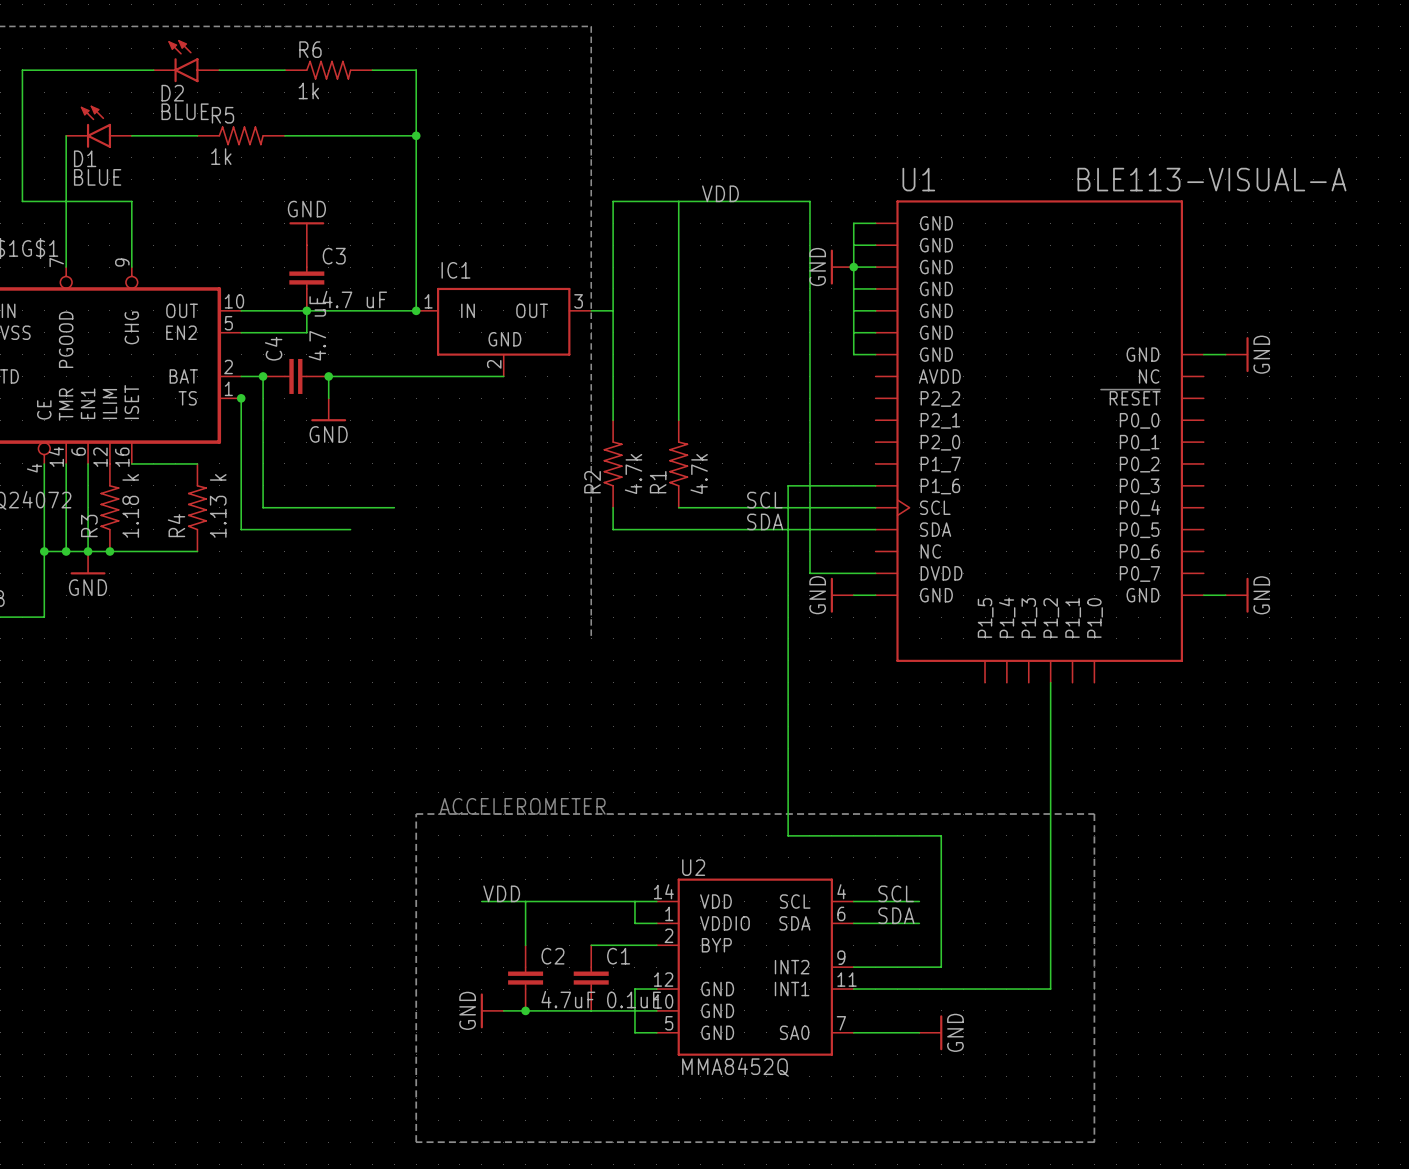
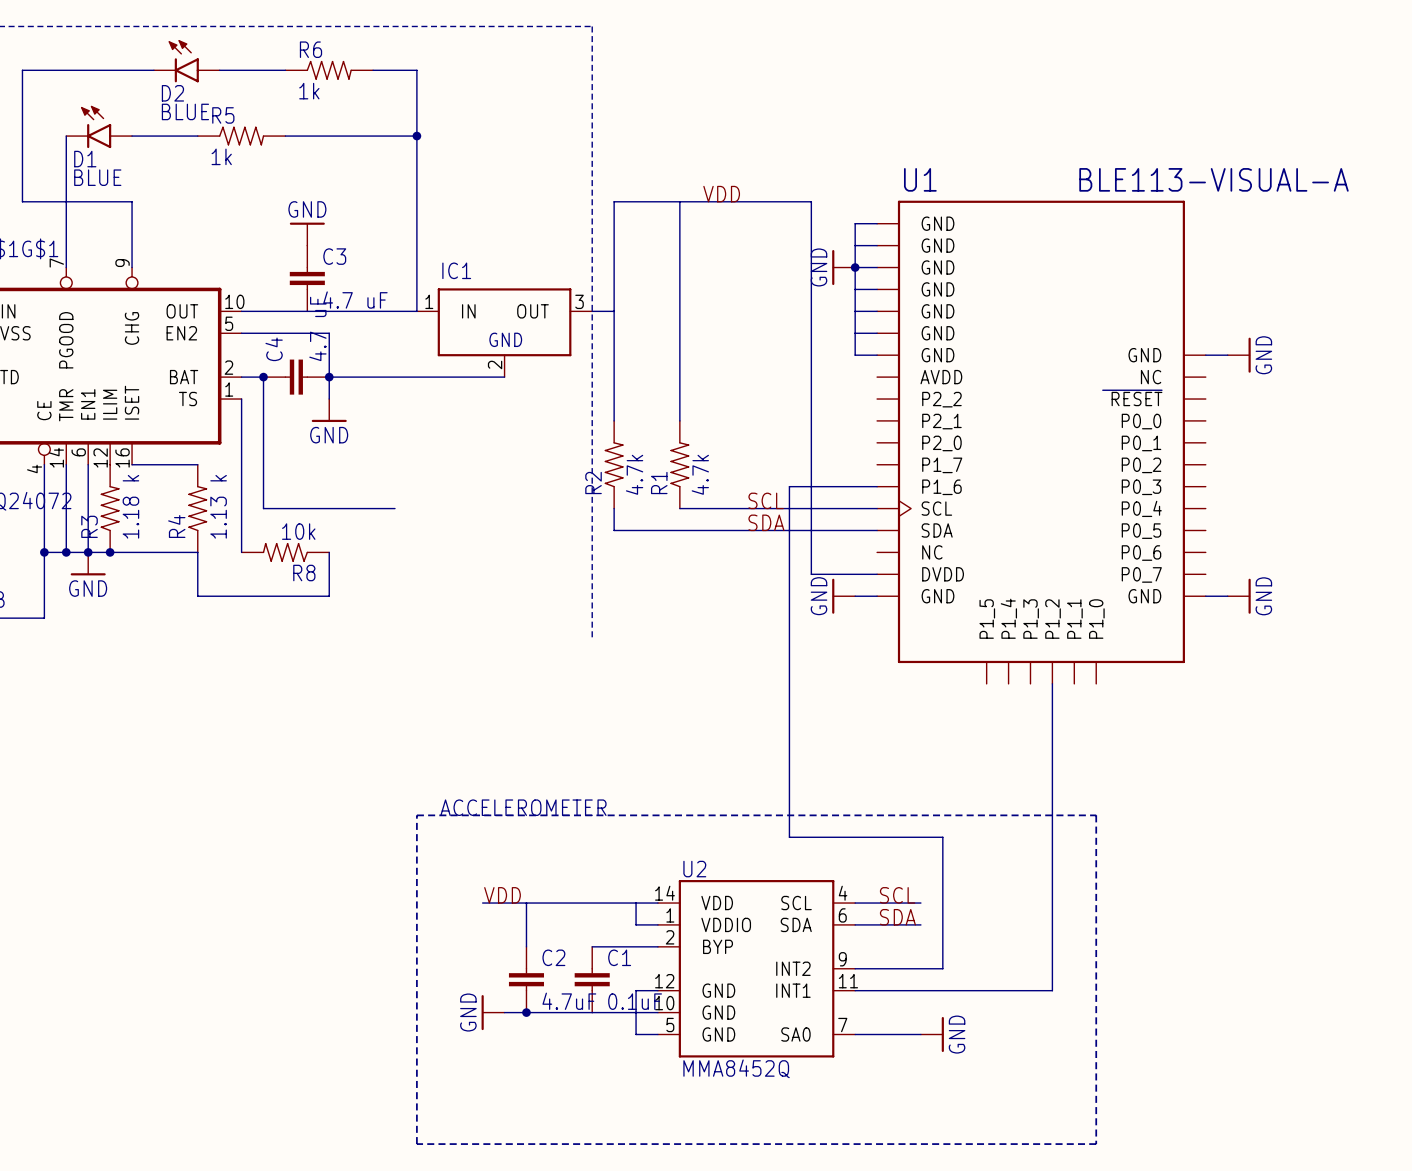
wire: (306, 310) (306, 332) -> (329, 377) (329, 333) (307, 333)
junction: (306, 310) -> none
junction: (416, 310) -> none
junction: (241, 398) -> none
wire: (241, 529) (350, 529) -> (241, 530) (241, 552)
wire: none -> (197, 552) (197, 596) (329, 596) (329, 552)
R8: none -> 10k (285, 552)

